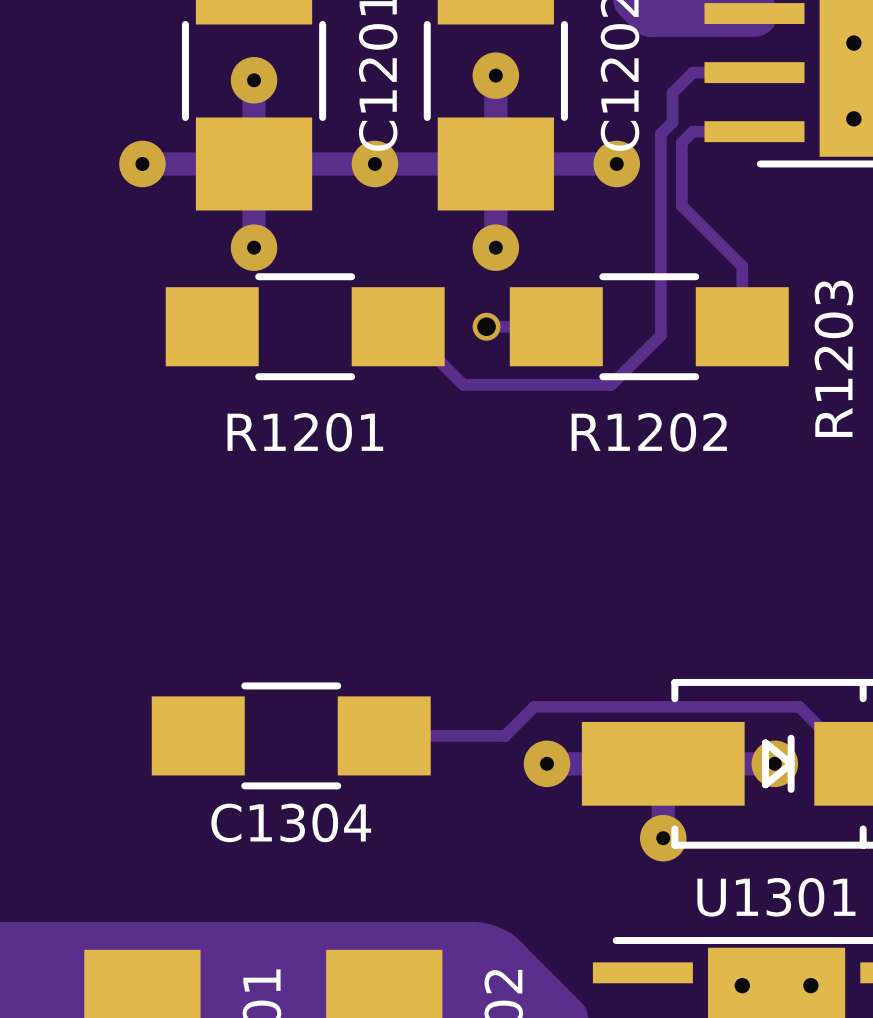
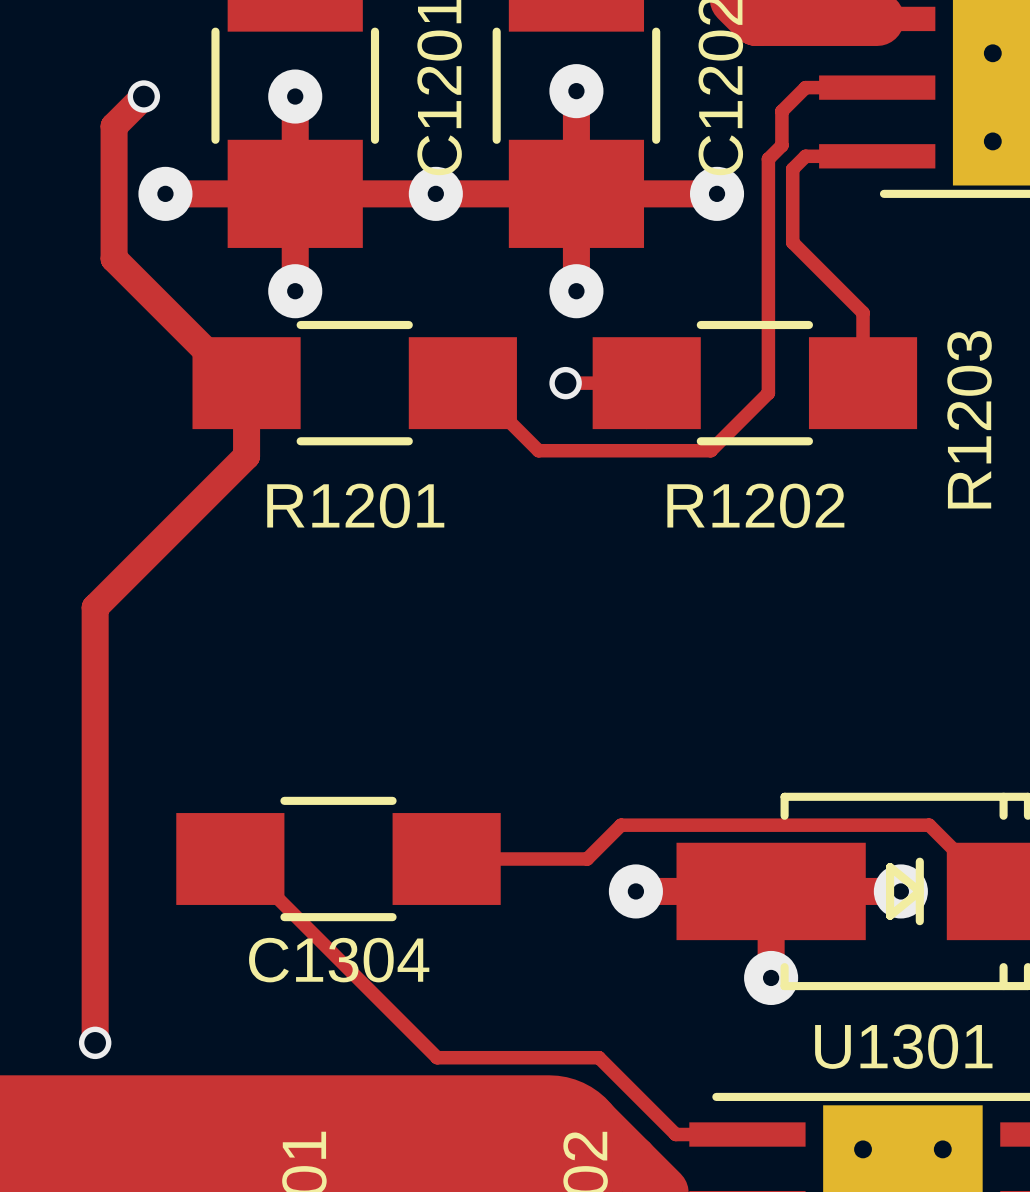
track: none -> (143, 96) (114, 126) (114, 258) (238, 383) (246, 383) (246, 456) (95, 607) (95, 1042)
via: none -> (143, 96)
track: none -> (230, 859) (238, 859) (437, 1057) (599, 1057) (675, 1134) (747, 1134)
via: none -> (95, 1042)

